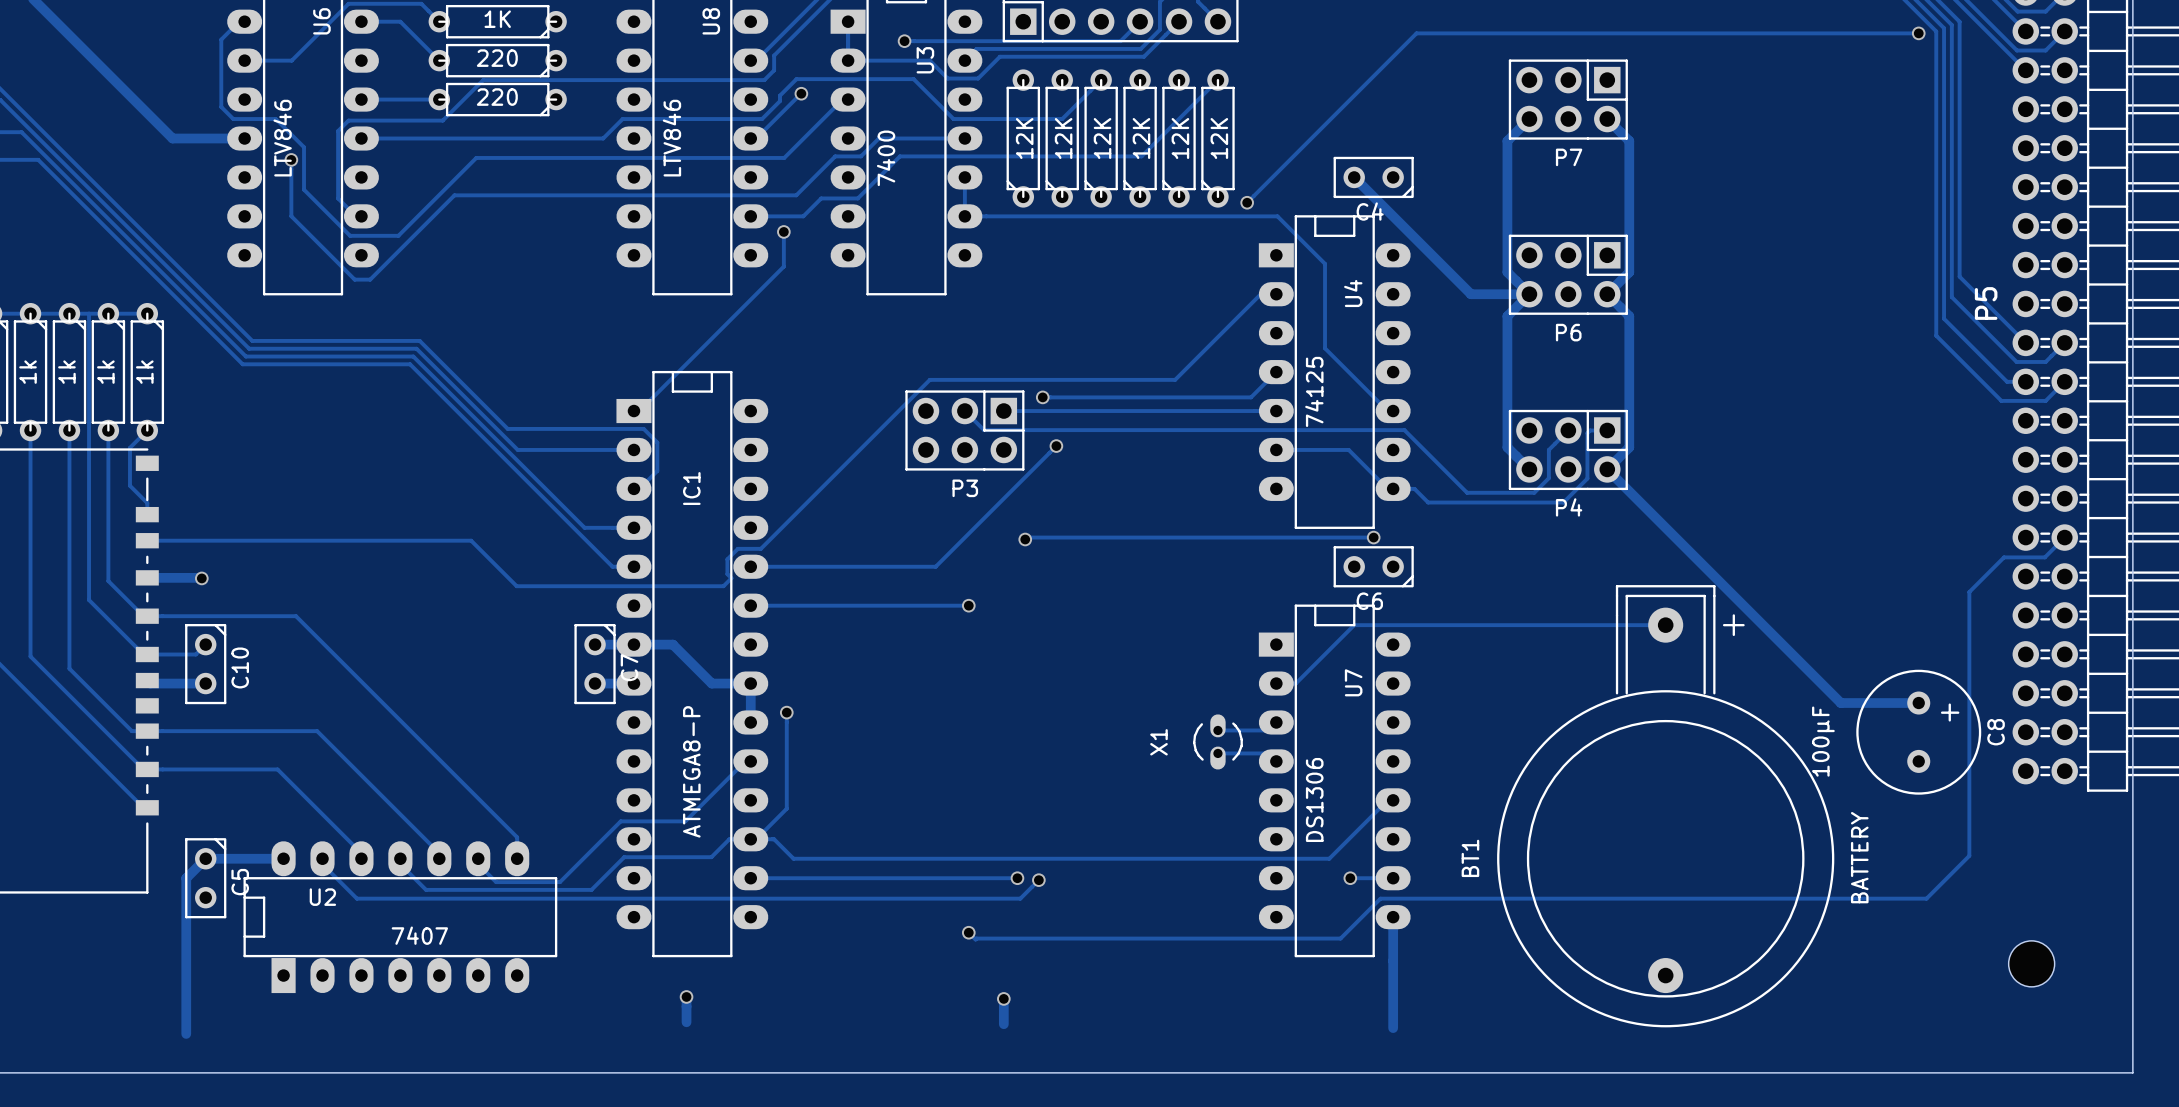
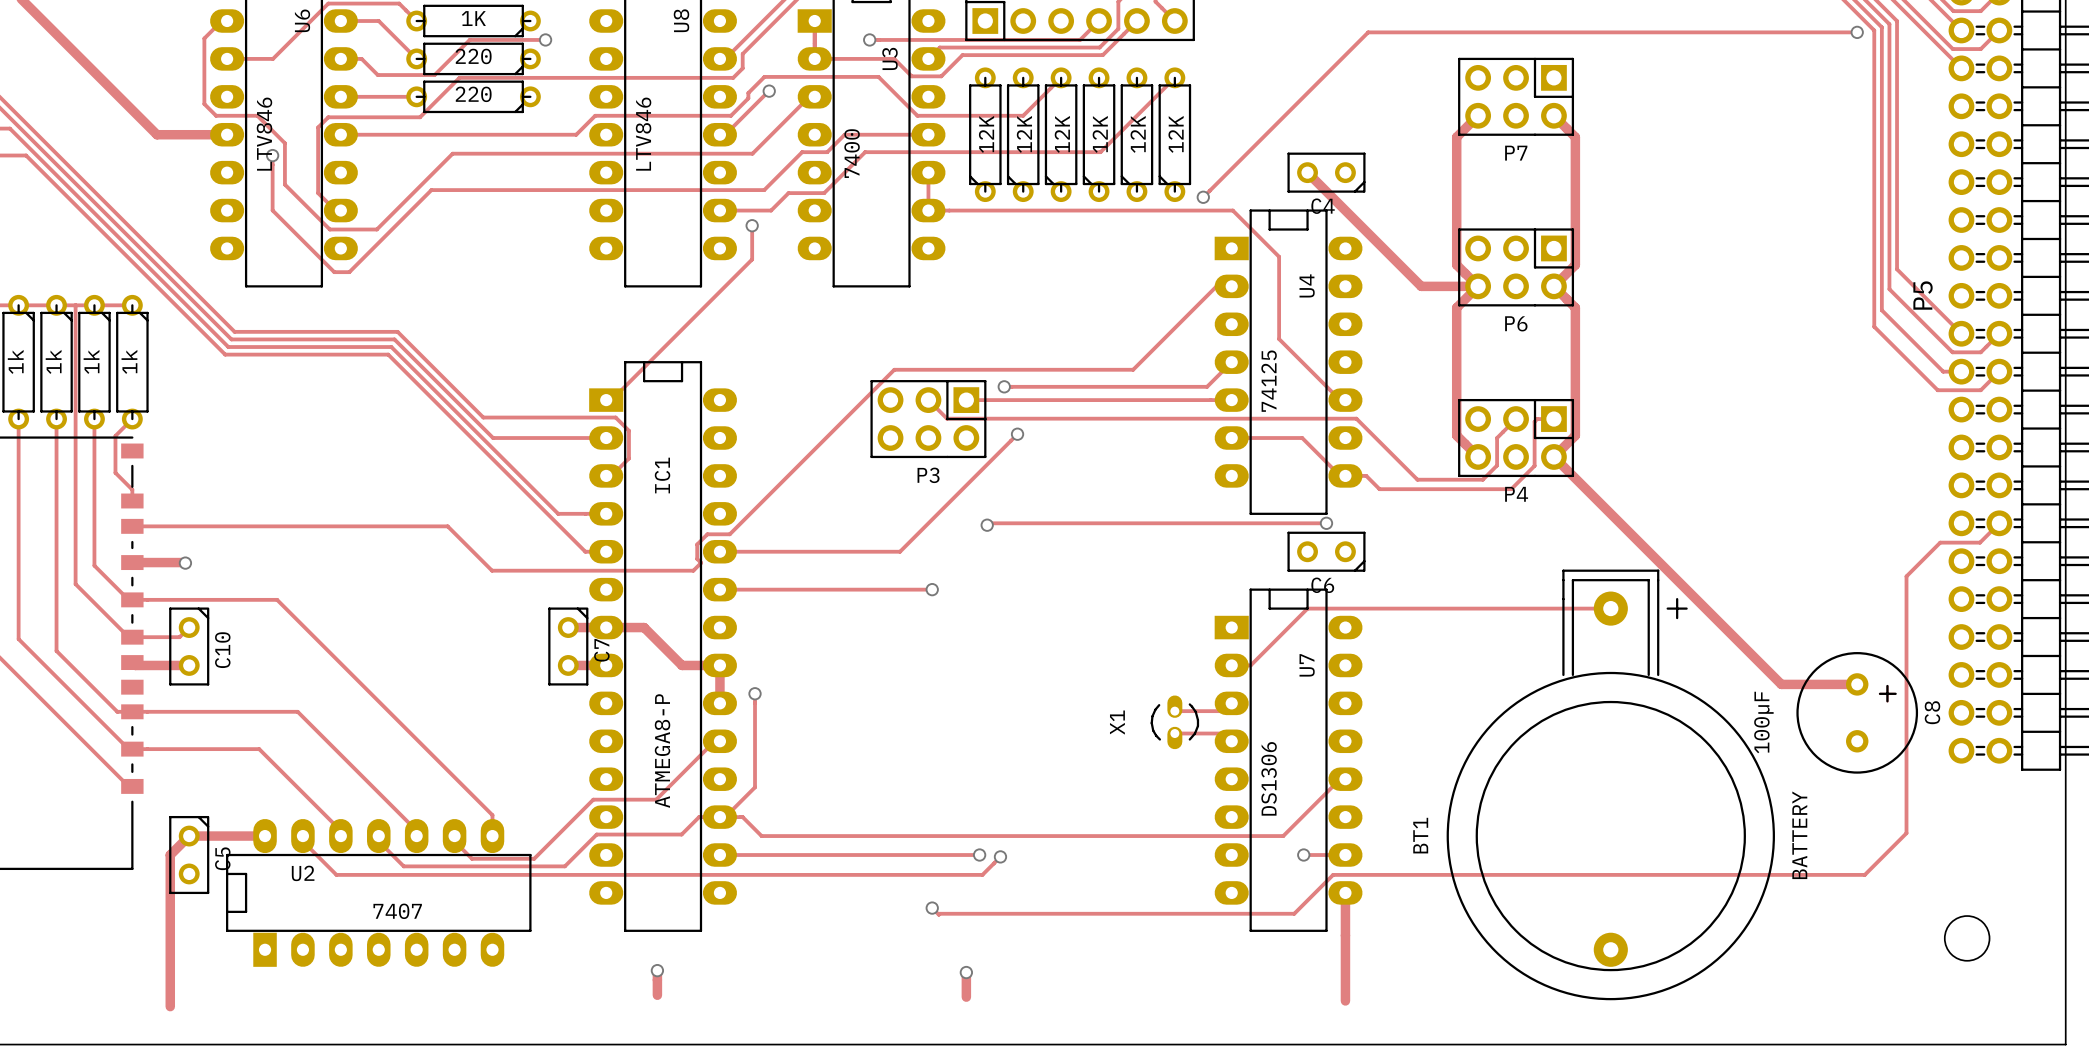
track: none -> (545, 39) (469, 39) (434, 75) (377, 75) (361, 58) (340, 58)
via: none -> (545, 39)

